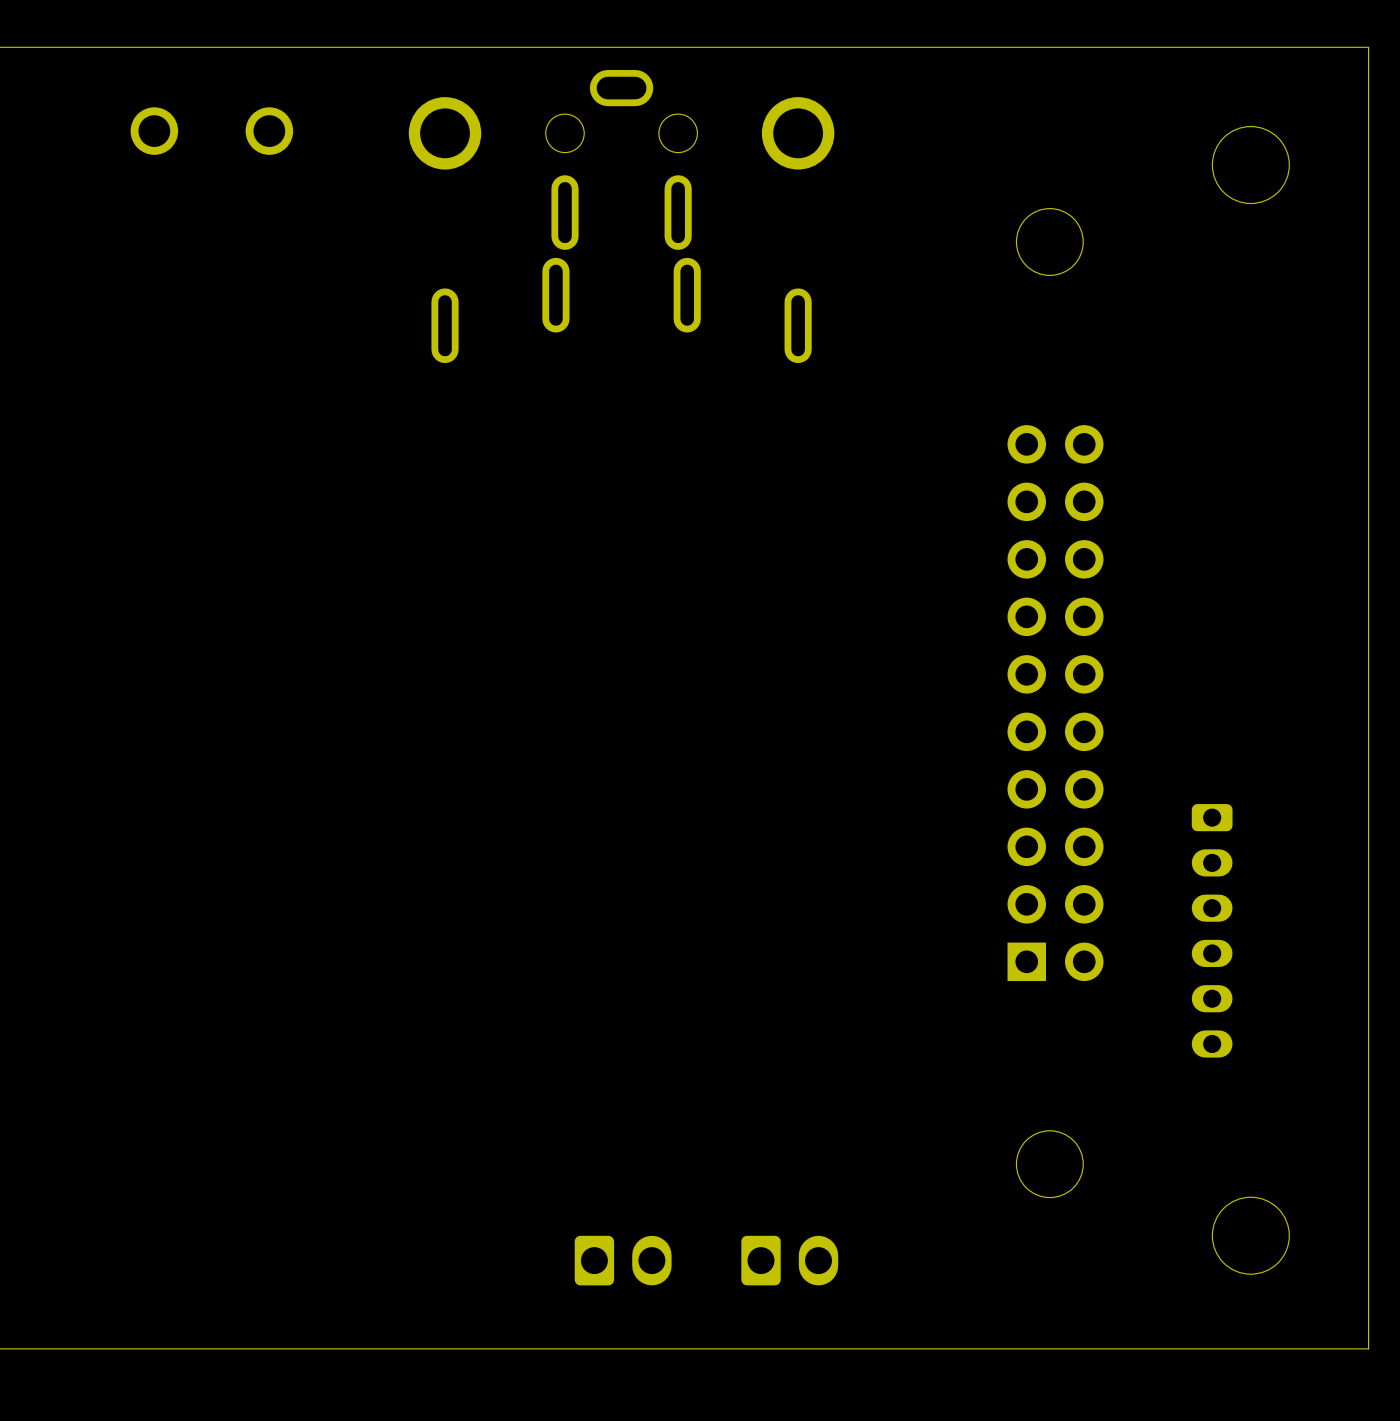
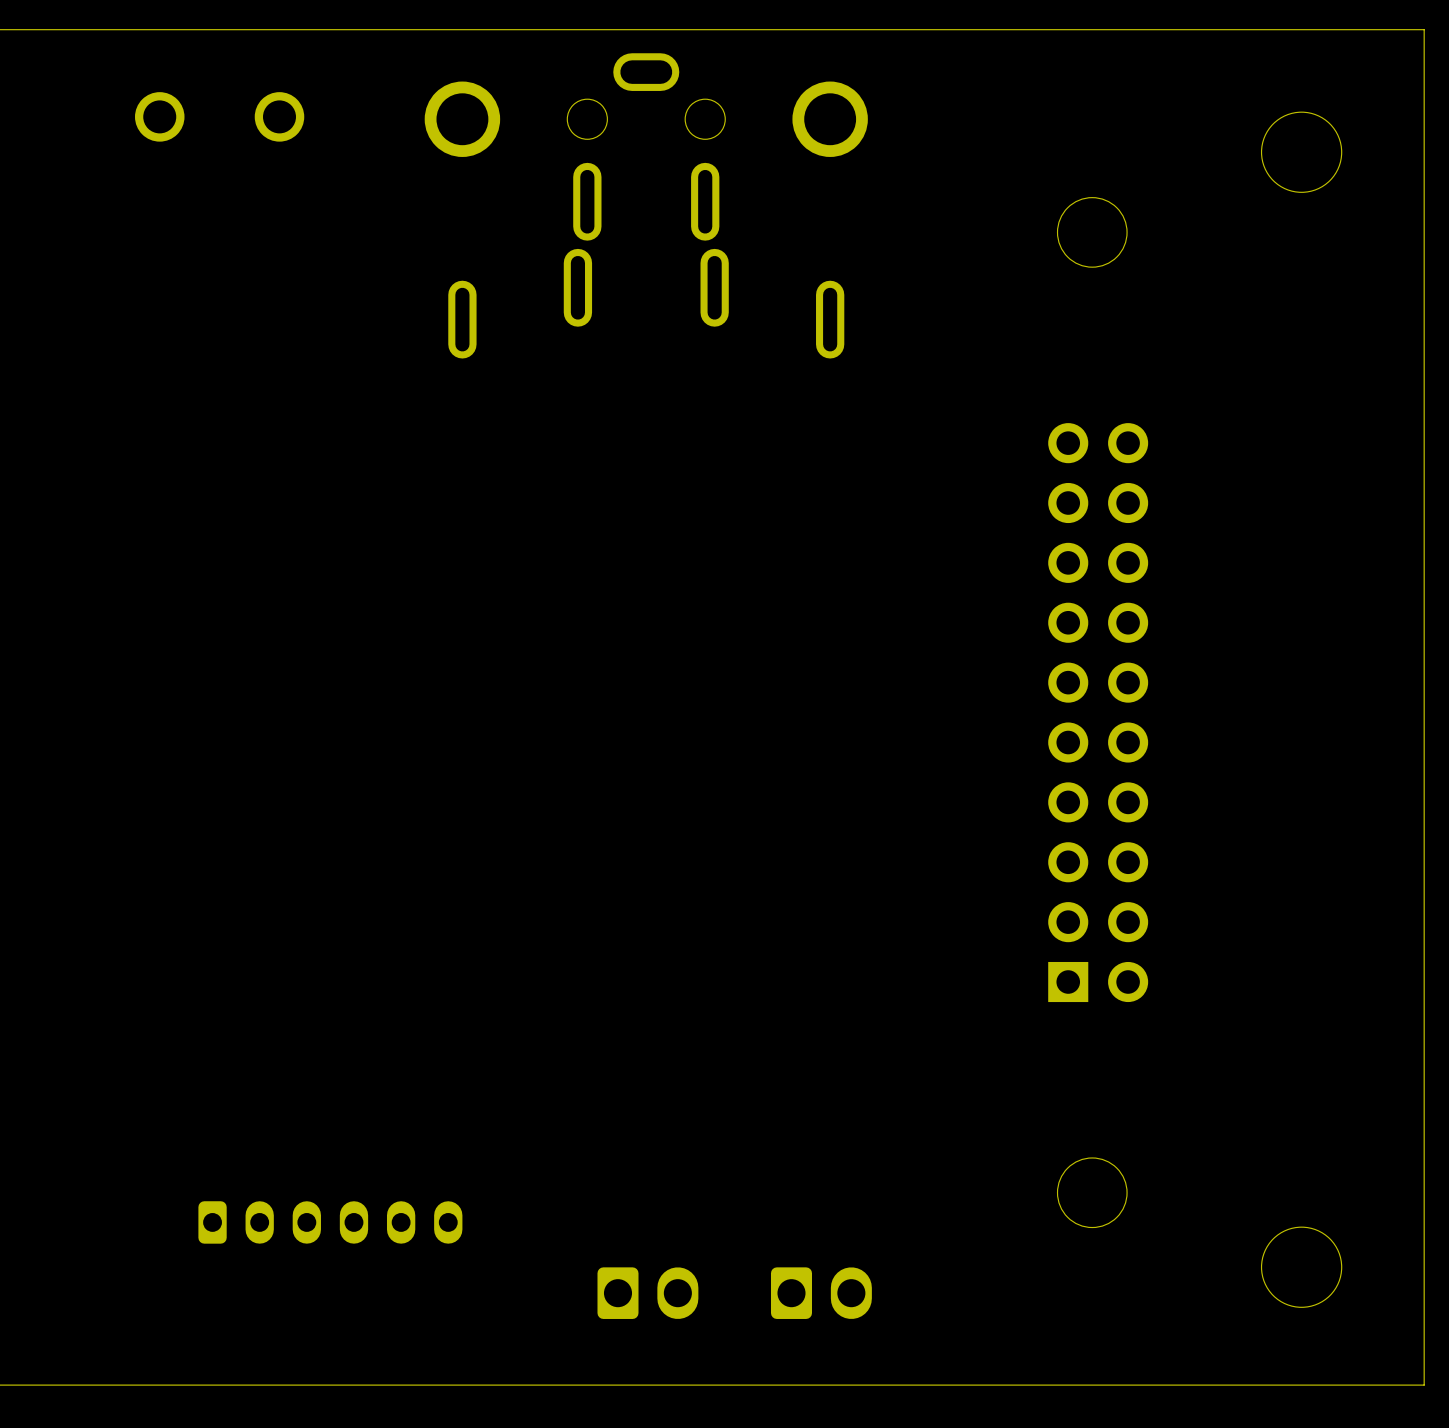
part: (1212, 930) -> none
part: none -> (330, 1222)

